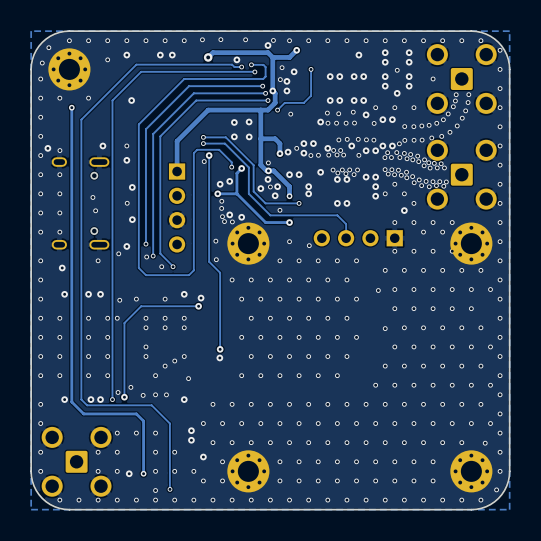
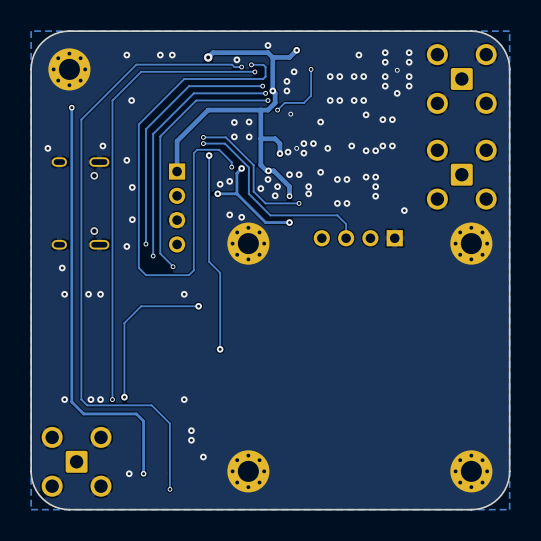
via: (202, 39) -> none
via: (220, 39) -> none
via: (245, 39) -> none
via: (69, 40) -> none
via: (88, 40) -> none
via: (107, 40) -> none
via: (126, 40) -> none
via: (145, 40) -> none
via: (165, 40) -> none
via: (184, 40) -> none
via: (273, 40) -> none
via: (289, 40) -> none
via: (308, 40) -> none
via: (327, 40) -> none
via: (346, 40) -> none
via: (366, 40) -> none
via: (385, 40) -> none
via: (404, 40) -> none
via: (423, 40) -> none
via: (442, 40) -> none
via: (461, 40) -> none
via: (480, 40) -> none
via: (48, 47) -> none
via: (500, 50) -> none
via: (107, 59) -> none
via: (42, 63) -> none
via: (282, 67) -> none
via: (500, 69) -> none
via: (40, 78) -> none
via: (433, 78) -> none
via: (280, 79) -> none
via: (500, 88) -> none
via: (456, 94) -> none
via: (468, 94) -> none
via: (40, 98) -> none
via: (59, 98) -> none
via: (88, 98) -> none
via: (455, 100) -> none
via: (468, 102) -> none
via: (453, 106) -> none
via: (375, 107) -> none
via: (394, 107) -> none
via: (413, 107) -> none
via: (500, 107) -> none
via: (465, 110) -> none
via: (353, 112) -> none
via: (327, 113) -> none
via: (338, 113) -> none
via: (448, 113) -> none
via: (40, 117) -> none
via: (462, 118) -> none
via: (443, 119) -> none
via: (327, 123) -> none
via: (336, 123) -> none
via: (346, 123) -> none
via: (354, 123) -> none
via: (374, 123) -> none
via: (436, 123) -> none
via: (421, 125) -> none
via: (429, 125) -> none
via: (457, 125) -> none
via: (404, 126) -> none
via: (413, 126) -> none
via: (500, 126) -> none
via: (449, 132) -> none
via: (40, 136) -> none
via: (441, 136) -> none
via: (431, 137) -> none
via: (338, 139) -> none
via: (347, 139) -> none
via: (358, 139) -> none
via: (366, 139) -> none
via: (373, 140) -> none
via: (404, 140) -> none
via: (414, 140) -> none
via: (422, 140) -> none
via: (399, 143) -> none
via: (126, 145) -> none
via: (500, 145) -> none
via: (59, 150) -> none
via: (333, 150) -> none
via: (340, 150) -> none
via: (387, 152) -> none
via: (396, 152) -> none
via: (404, 153) -> none
via: (337, 154) -> none
via: (410, 154) -> none
via: (40, 155) -> none
via: (310, 155) -> none
via: (318, 155) -> none
via: (328, 155) -> none
via: (343, 155) -> none
via: (358, 155) -> none
via: (417, 156) -> none
via: (384, 157) -> none
via: (391, 157) -> none
via: (399, 157) -> none
via: (407, 158) -> none
via: (412, 159) -> none
via: (424, 159) -> none
via: (204, 161) -> none
via: (418, 161) -> none
via: (268, 162) -> none
via: (428, 162) -> none
via: (434, 163) -> none
via: (441, 163) -> none
via: (424, 165) -> none
via: (500, 165) -> none
via: (437, 167) -> none
via: (444, 167) -> none
via: (430, 168) -> none
via: (342, 169) -> none
via: (349, 169) -> none
via: (357, 169) -> none
via: (385, 169) -> none
via: (391, 169) -> none
via: (333, 170) -> none
via: (398, 170) -> none
via: (406, 172) -> none
via: (337, 173) -> none
via: (345, 173) -> none
via: (40, 174) -> none
via: (59, 174) -> none
via: (354, 174) -> none
via: (388, 174) -> none
via: (394, 174) -> none
via: (401, 175) -> none
via: (412, 176) -> none
via: (406, 177) -> none
via: (419, 179) -> none
via: (426, 181) -> none
via: (432, 181) -> none
via: (439, 181) -> none
via: (446, 181) -> none
via: (414, 182) -> none
via: (394, 184) -> none
via: (500, 184) -> none
via: (421, 185) -> none
via: (436, 185) -> none
via: (270, 186) -> none
via: (429, 186) -> none
via: (443, 186) -> none
via: (40, 193) -> none
via: (59, 193) -> none
via: (385, 193) -> none
via: (404, 193) -> none
via: (92, 197) -> none
via: (221, 201) -> none
via: (127, 203) -> none
via: (413, 203) -> none
via: (500, 203) -> none
via: (221, 208) -> none
via: (95, 210) -> none
via: (279, 210) -> none
via: (40, 212) -> none
via: (59, 212) -> none
via: (222, 216) -> none
via: (224, 221) -> none
via: (232, 221) -> none
via: (394, 222) -> none
via: (413, 222) -> none
via: (433, 222) -> none
via: (452, 222) -> none
via: (500, 222) -> none
via: (40, 232) -> none
via: (59, 232) -> none
via: (423, 232) -> none
via: (442, 232) -> none
via: (215, 241) -> none
via: (289, 241) -> none
via: (500, 241) -> none
via: (309, 245) -> none
via: (394, 251) -> none
via: (413, 251) -> none
via: (433, 251) -> none
via: (452, 251) -> none
via: (118, 253) -> none
via: (146, 257) -> none
via: (216, 259) -> none
via: (40, 260) -> none
via: (98, 260) -> none
via: (279, 260) -> none
via: (299, 260) -> none
via: (318, 260) -> none
via: (337, 260) -> none
via: (356, 260) -> none
via: (500, 260) -> none
via: (161, 266) -> none
via: (385, 270) -> none
via: (404, 270) -> none
via: (423, 270) -> none
via: (442, 270) -> none
via: (461, 270) -> none
via: (480, 270) -> none
via: (40, 279) -> none
via: (232, 279) -> none
via: (251, 279) -> none
via: (270, 279) -> none
via: (289, 279) -> none
via: (308, 279) -> none
via: (327, 279) -> none
via: (346, 279) -> none
via: (500, 279) -> none
via: (394, 289) -> none
via: (413, 289) -> none
via: (433, 289) -> none
via: (452, 289) -> none
via: (471, 289) -> none
via: (490, 289) -> none
via: (378, 290) -> none
via: (201, 298) -> none
via: (40, 299) -> none
via: (136, 299) -> none
via: (165, 299) -> none
via: (241, 299) -> none
via: (260, 299) -> none
via: (279, 299) -> none
via: (299, 299) -> none
via: (318, 299) -> none
via: (337, 299) -> none
via: (356, 299) -> none
via: (500, 299) -> none
via: (119, 300) -> none
via: (394, 308) -> none
via: (413, 308) -> none
via: (433, 308) -> none
via: (452, 308) -> none
via: (471, 308) -> none
via: (40, 318) -> none
via: (59, 318) -> none
via: (88, 318) -> none
via: (107, 318) -> none
via: (117, 318) -> none
via: (145, 318) -> none
via: (165, 318) -> none
via: (184, 318) -> none
via: (251, 318) -> none
via: (270, 318) -> none
via: (289, 318) -> none
via: (308, 318) -> none
via: (327, 318) -> none
via: (346, 318) -> none
via: (500, 318) -> none
via: (145, 327) -> none
via: (165, 327) -> none
via: (184, 327) -> none
via: (404, 327) -> none
via: (423, 327) -> none
via: (442, 327) -> none
via: (461, 327) -> none
via: (480, 327) -> none
via: (385, 328) -> none
via: (40, 337) -> none
via: (59, 337) -> none
via: (88, 337) -> none
via: (107, 337) -> none
via: (241, 337) -> none
via: (260, 337) -> none
via: (279, 337) -> none
via: (299, 337) -> none
via: (318, 337) -> none
via: (337, 337) -> none
via: (356, 337) -> none
via: (500, 337) -> none
via: (145, 346) -> none
via: (394, 346) -> none
via: (413, 346) -> none
via: (433, 346) -> none
via: (452, 346) -> none
via: (471, 346) -> none
via: (490, 346) -> none
via: (40, 356) -> none
via: (59, 356) -> none
via: (88, 356) -> none
via: (107, 356) -> none
via: (145, 356) -> none
via: (184, 356) -> none
via: (251, 356) -> none
via: (270, 356) -> none
via: (289, 356) -> none
via: (308, 356) -> none
via: (327, 356) -> none
via: (346, 356) -> none
via: (500, 356) -> none
via: (219, 357) -> none
via: (174, 361) -> none
via: (165, 366) -> none
via: (385, 366) -> none
via: (404, 366) -> none
via: (423, 366) -> none
via: (442, 366) -> none
via: (461, 366) -> none
via: (480, 366) -> none
via: (40, 375) -> none
via: (59, 375) -> none
via: (88, 375) -> none
via: (107, 375) -> none
via: (155, 375) -> none
via: (241, 375) -> none
via: (260, 375) -> none
via: (279, 375) -> none
via: (299, 375) -> none
via: (318, 375) -> none
via: (337, 375) -> none
via: (500, 375) -> none
via: (188, 378) -> none
via: (375, 385) -> none
via: (394, 385) -> none
via: (413, 385) -> none
via: (433, 385) -> none
via: (452, 385) -> none
via: (471, 385) -> none
via: (490, 385) -> none
via: (130, 387) -> none
via: (118, 392) -> none
via: (155, 394) -> none
via: (166, 394) -> none
via: (500, 394) -> none
via: (143, 395) -> none
via: (40, 404) -> none
via: (212, 404) -> none
via: (232, 404) -> none
via: (251, 404) -> none
via: (270, 404) -> none
via: (289, 404) -> none
via: (308, 404) -> none
via: (327, 404) -> none
via: (346, 404) -> none
via: (366, 404) -> none
via: (385, 404) -> none
via: (404, 404) -> none
via: (423, 404) -> none
via: (442, 404) -> none
via: (461, 404) -> none
via: (480, 404) -> none
via: (500, 413) -> none
via: (40, 423) -> none
via: (203, 423) -> none
via: (222, 423) -> none
via: (241, 423) -> none
via: (260, 423) -> none
via: (279, 423) -> none
via: (299, 423) -> none
via: (318, 423) -> none
via: (337, 423) -> none
via: (356, 423) -> none
via: (375, 423) -> none
via: (394, 423) -> none
via: (413, 423) -> none
via: (433, 423) -> none
via: (452, 423) -> none
via: (471, 423) -> none
via: (490, 423) -> none
via: (117, 433) -> none
via: (136, 433) -> none
via: (155, 433) -> none
via: (500, 433) -> none
via: (212, 442) -> none
via: (232, 442) -> none
via: (251, 442) -> none
via: (270, 442) -> none
via: (289, 442) -> none
via: (308, 442) -> none
via: (327, 442) -> none
via: (346, 442) -> none
via: (366, 442) -> none
via: (385, 442) -> none
via: (404, 442) -> none
via: (423, 442) -> none
via: (442, 442) -> none
via: (461, 442) -> none
via: (485, 443) -> none
via: (40, 452) -> none
via: (98, 452) -> none
via: (117, 452) -> none
via: (155, 452) -> none
via: (174, 452) -> none
via: (500, 452) -> none
via: (222, 461) -> none
via: (279, 461) -> none
via: (299, 461) -> none
via: (318, 461) -> none
via: (337, 461) -> none
via: (356, 461) -> none
via: (375, 461) -> none
via: (394, 461) -> none
via: (413, 461) -> none
via: (433, 461) -> none
via: (40, 471) -> none
via: (98, 471) -> none
via: (117, 471) -> none
via: (155, 471) -> none
via: (174, 471) -> none
via: (193, 471) -> none
via: (500, 471) -> none
via: (203, 480) -> none
via: (222, 480) -> none
via: (279, 480) -> none
via: (299, 480) -> none
via: (318, 480) -> none
via: (337, 480) -> none
via: (356, 480) -> none
via: (375, 480) -> none
via: (394, 480) -> none
via: (413, 480) -> none
via: (433, 480) -> none
via: (496, 489) -> none
via: (155, 490) -> none
via: (59, 500) -> none
via: (78, 500) -> none
via: (98, 500) -> none
via: (117, 500) -> none
via: (136, 500) -> none
via: (155, 500) -> none
via: (174, 500) -> none
via: (193, 500) -> none
via: (212, 500) -> none
via: (232, 500) -> none
via: (251, 500) -> none
via: (270, 500) -> none
via: (289, 500) -> none
via: (308, 500) -> none
via: (327, 500) -> none
via: (346, 500) -> none
via: (366, 500) -> none
via: (385, 500) -> none
via: (404, 500) -> none
via: (423, 500) -> none
via: (442, 500) -> none
via: (461, 500) -> none
via: (480, 500) -> none

